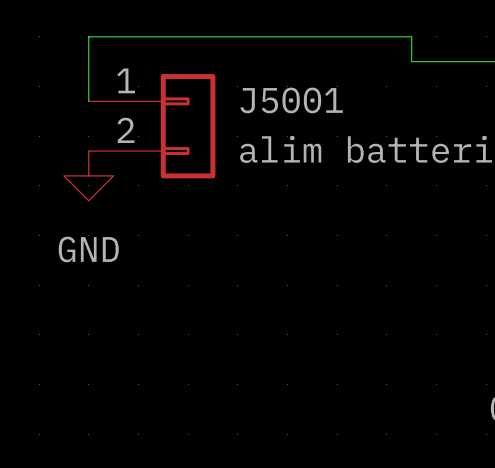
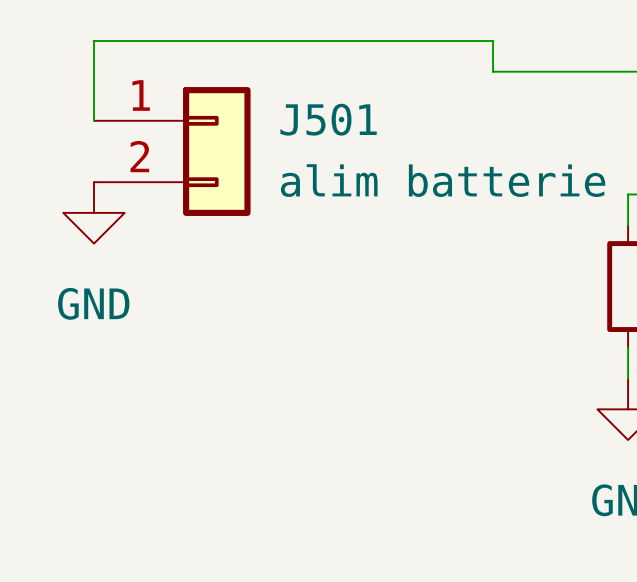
J5001 name: J5001 (291, 100) -> J501 (328, 119)

